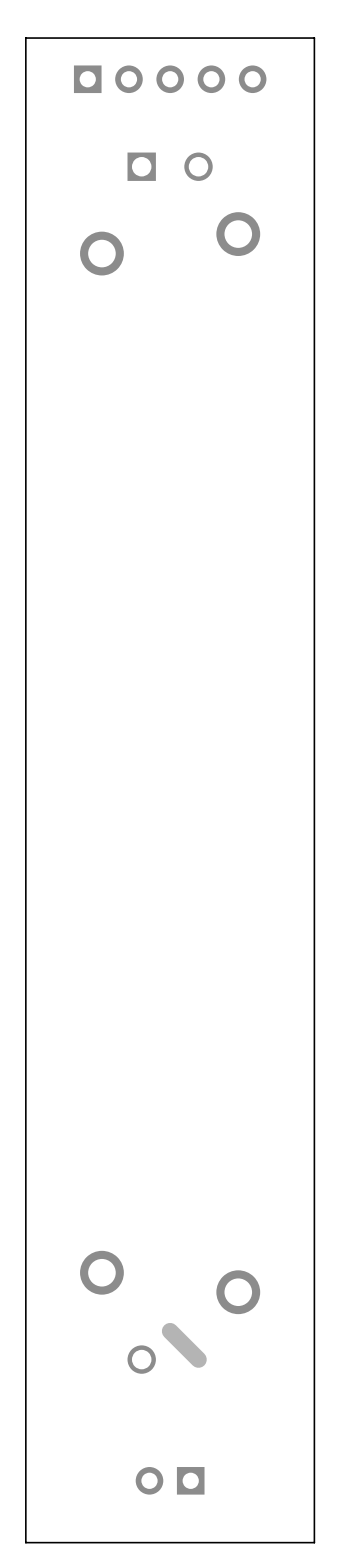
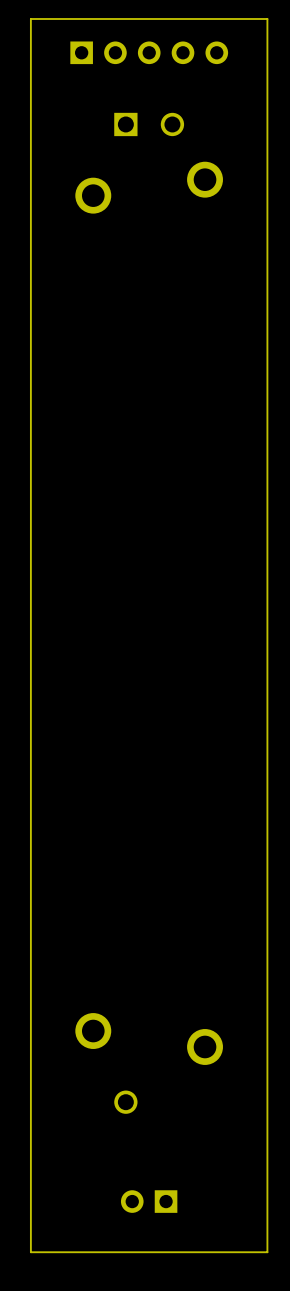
track: (170, 1331) (198, 1359) -> none

